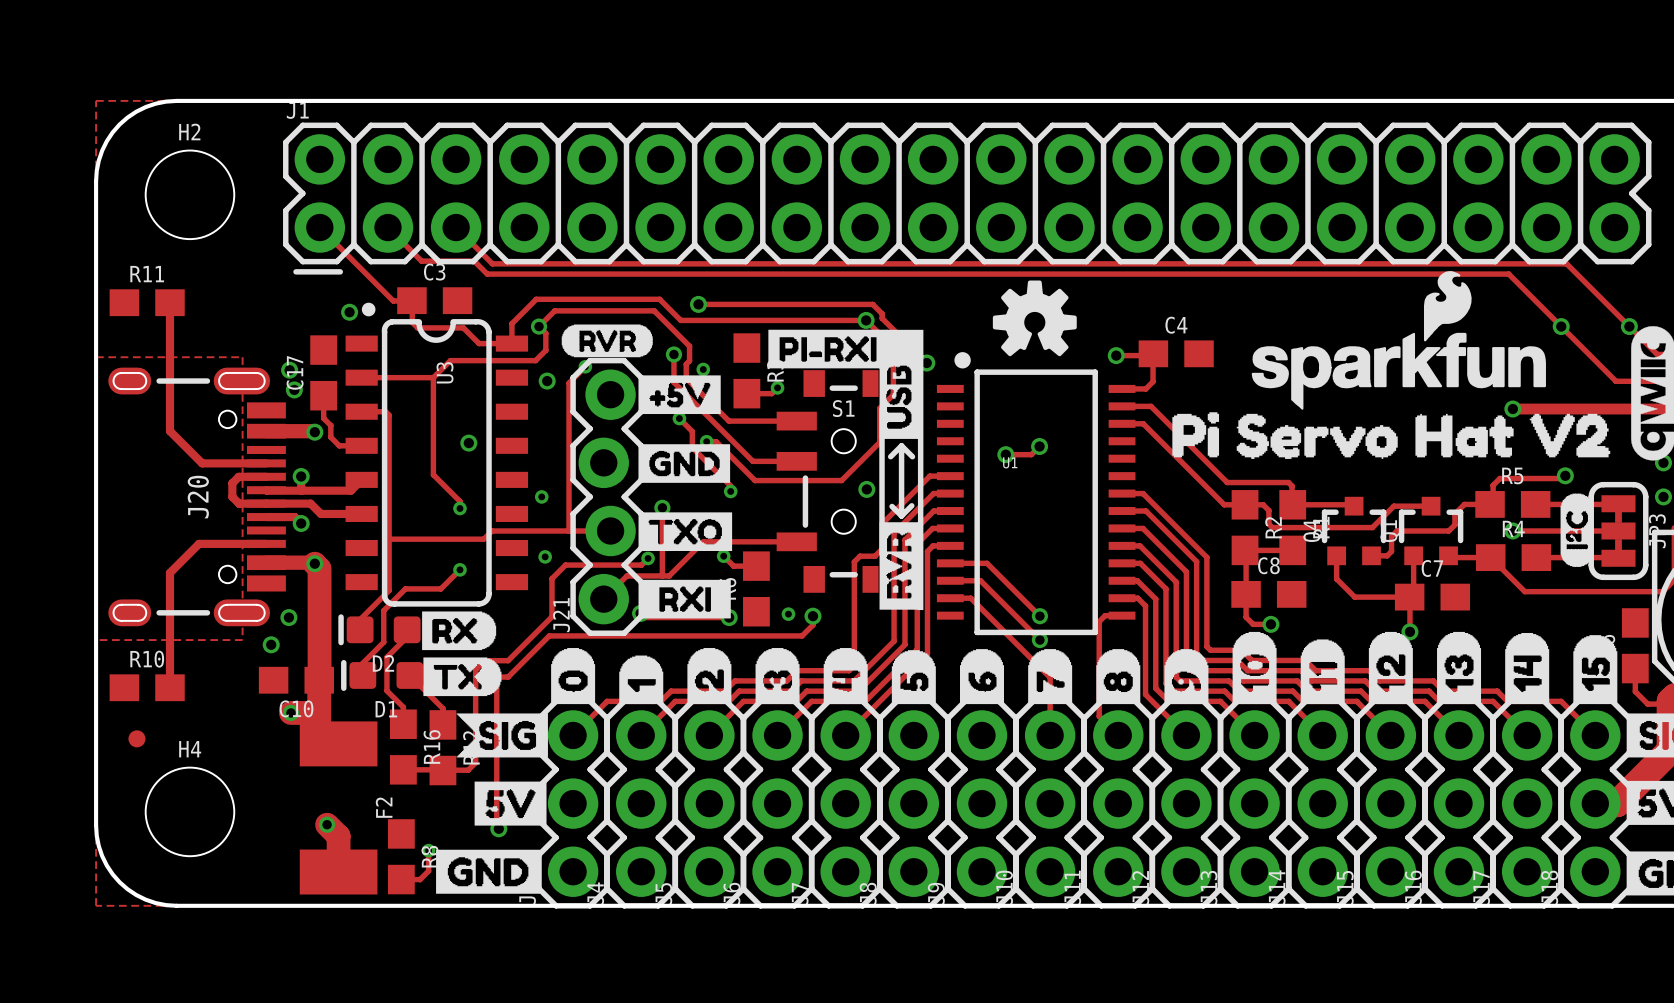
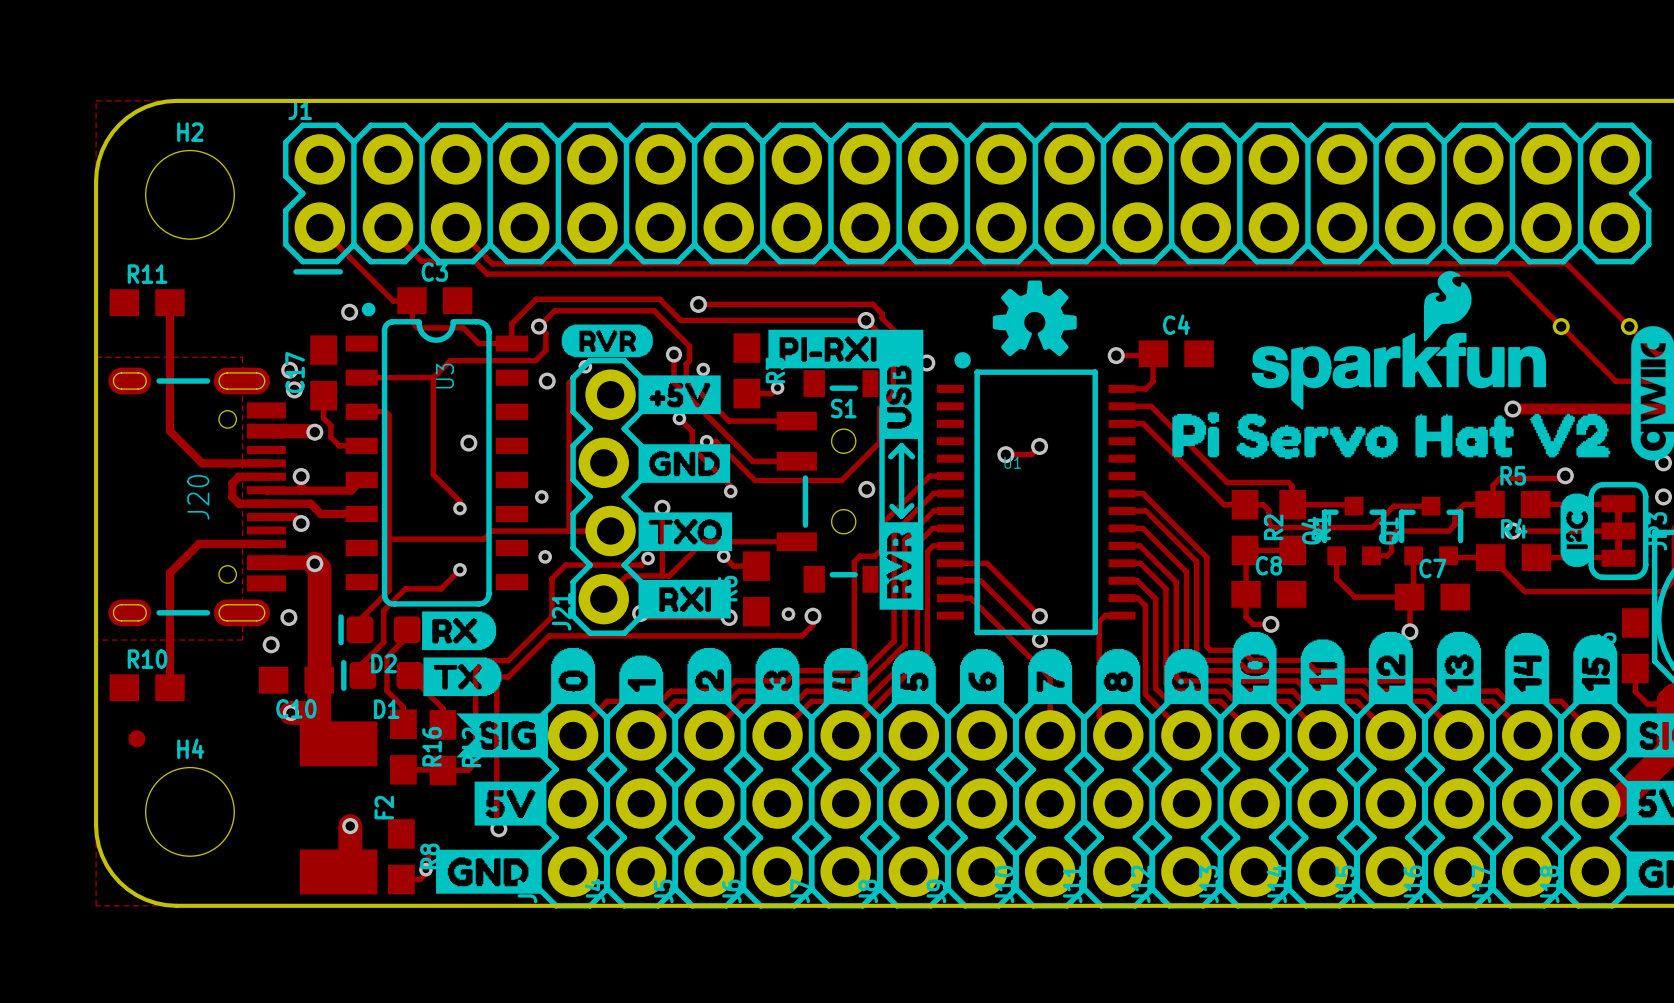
track: (327, 824) (338, 836) (338, 864) -> (350, 826) (350, 864) (338, 864)
via position: (327, 824) -> (350, 826)
via position: (428, 850) -> (425, 869)

